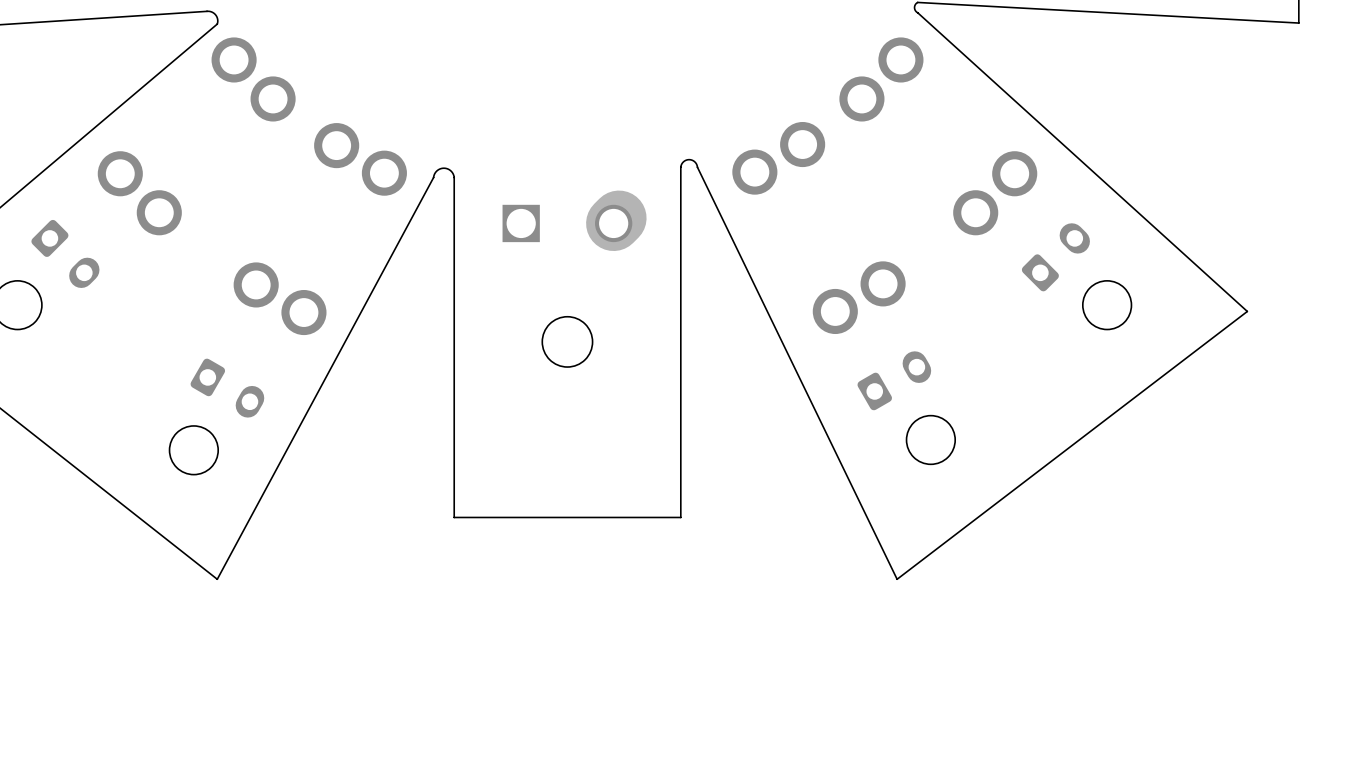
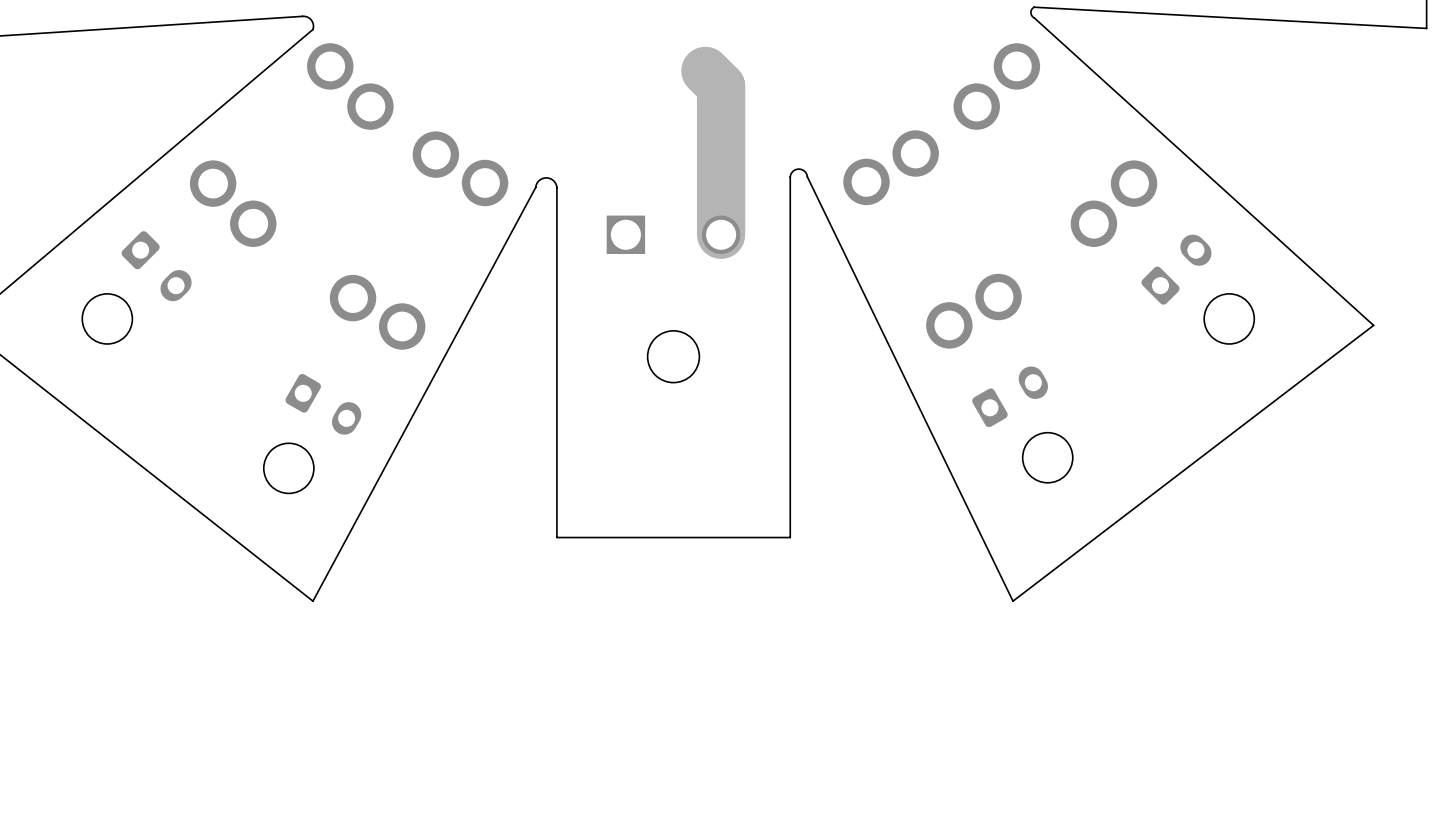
track: (619, 218) (613, 223) -> (705, 70) (721, 86) (721, 234)

